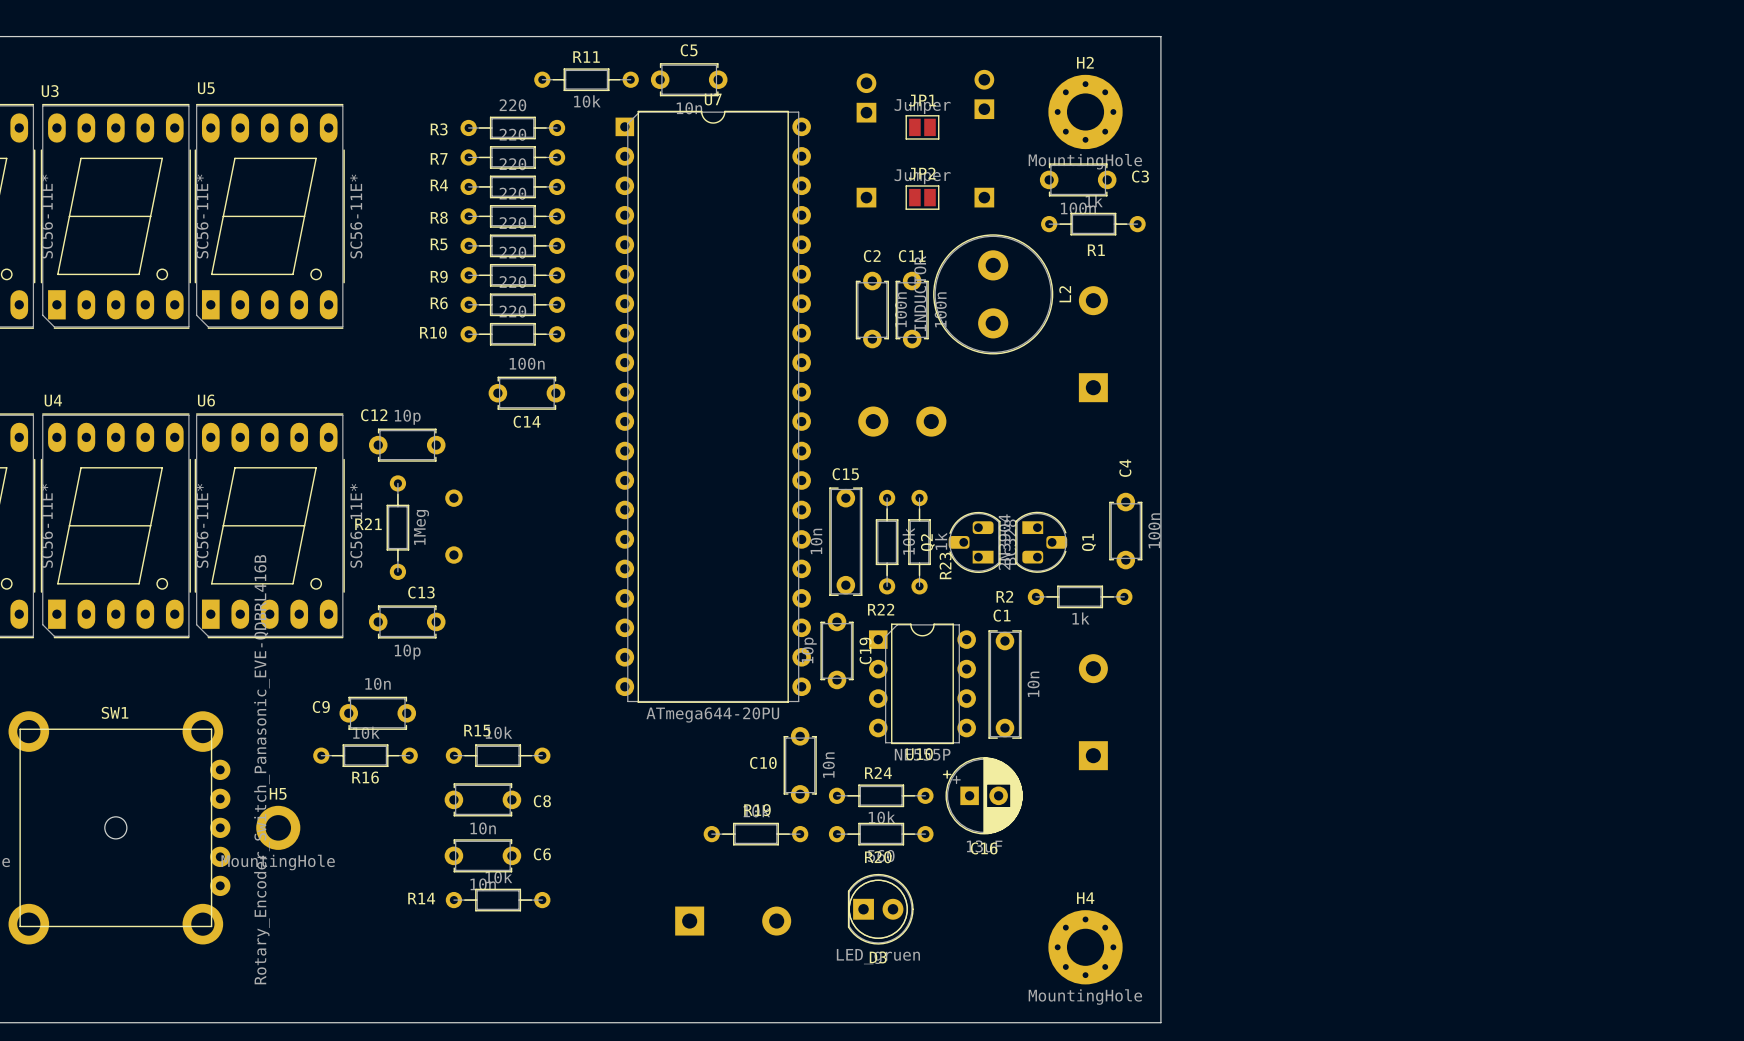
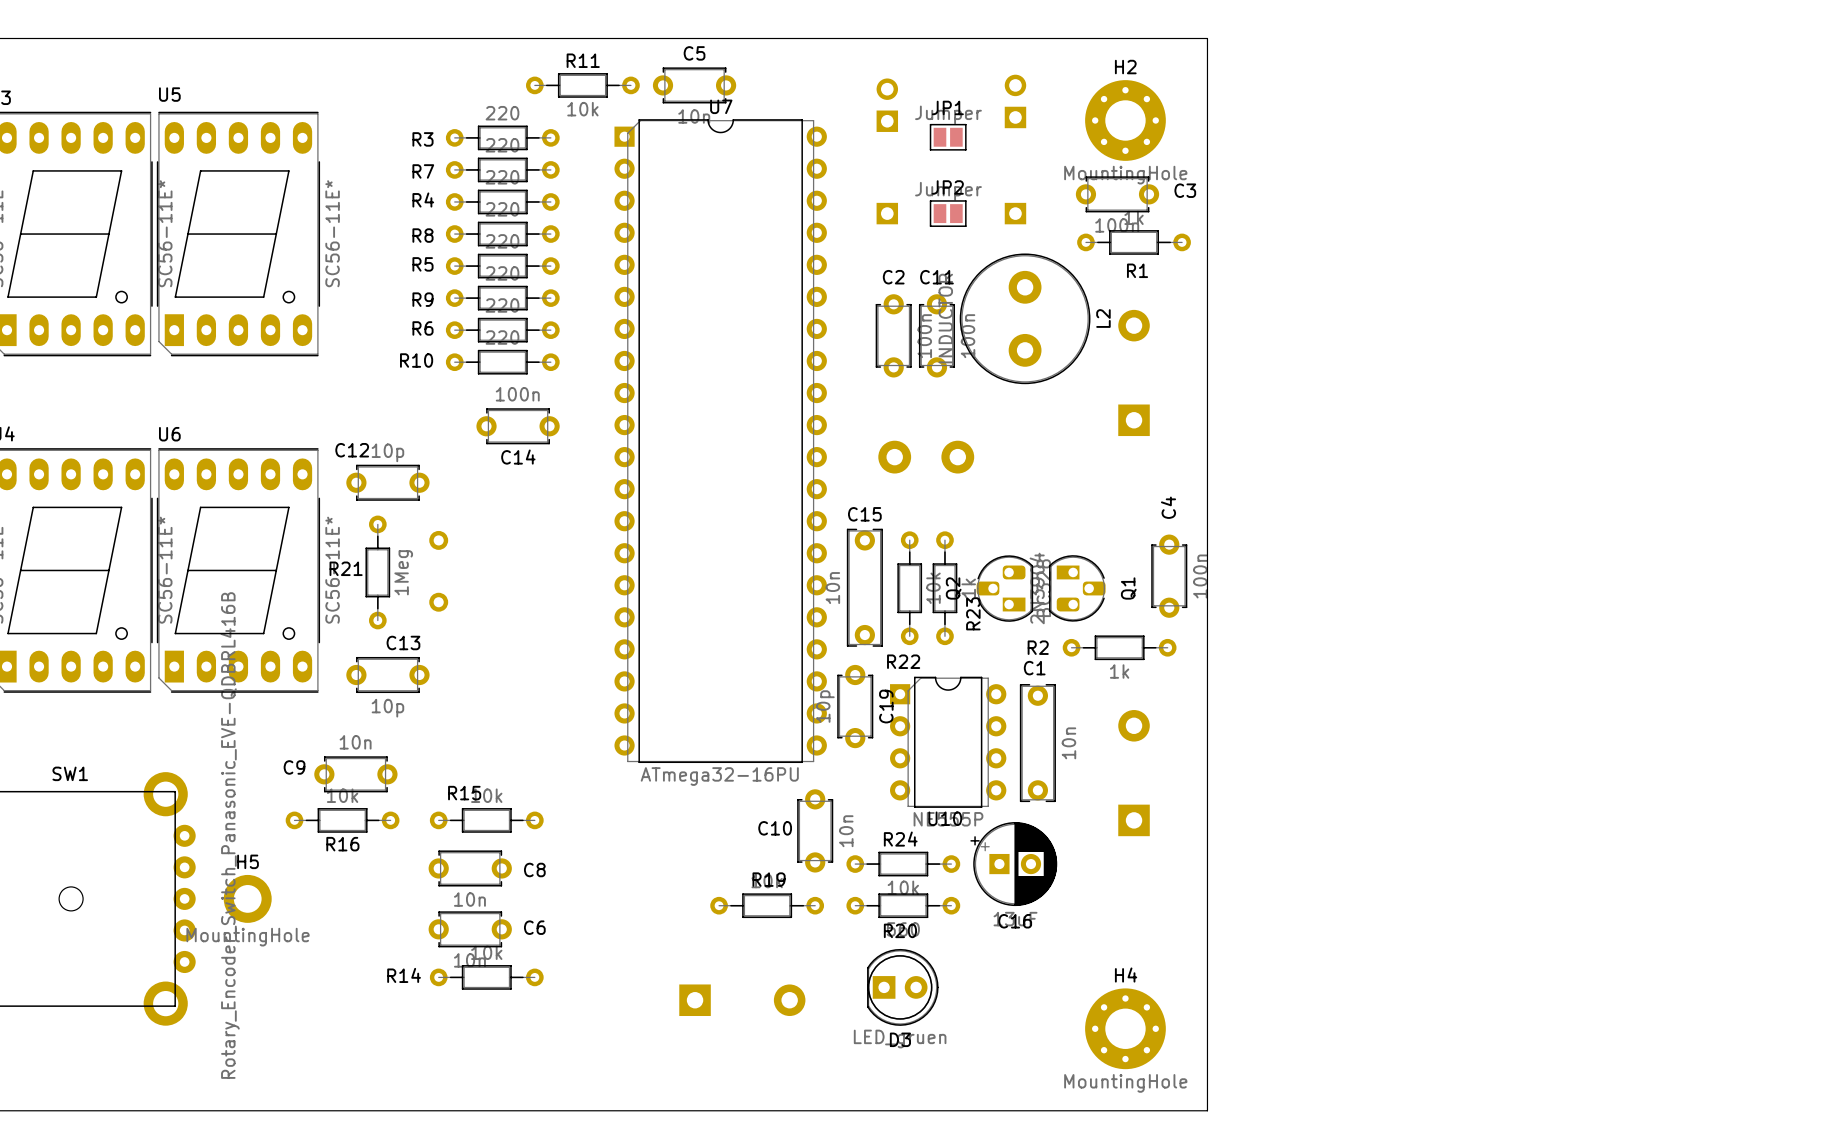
U7 value: ATmega644-20PU (712, 714) -> ATmega32-16PU (719, 776)

